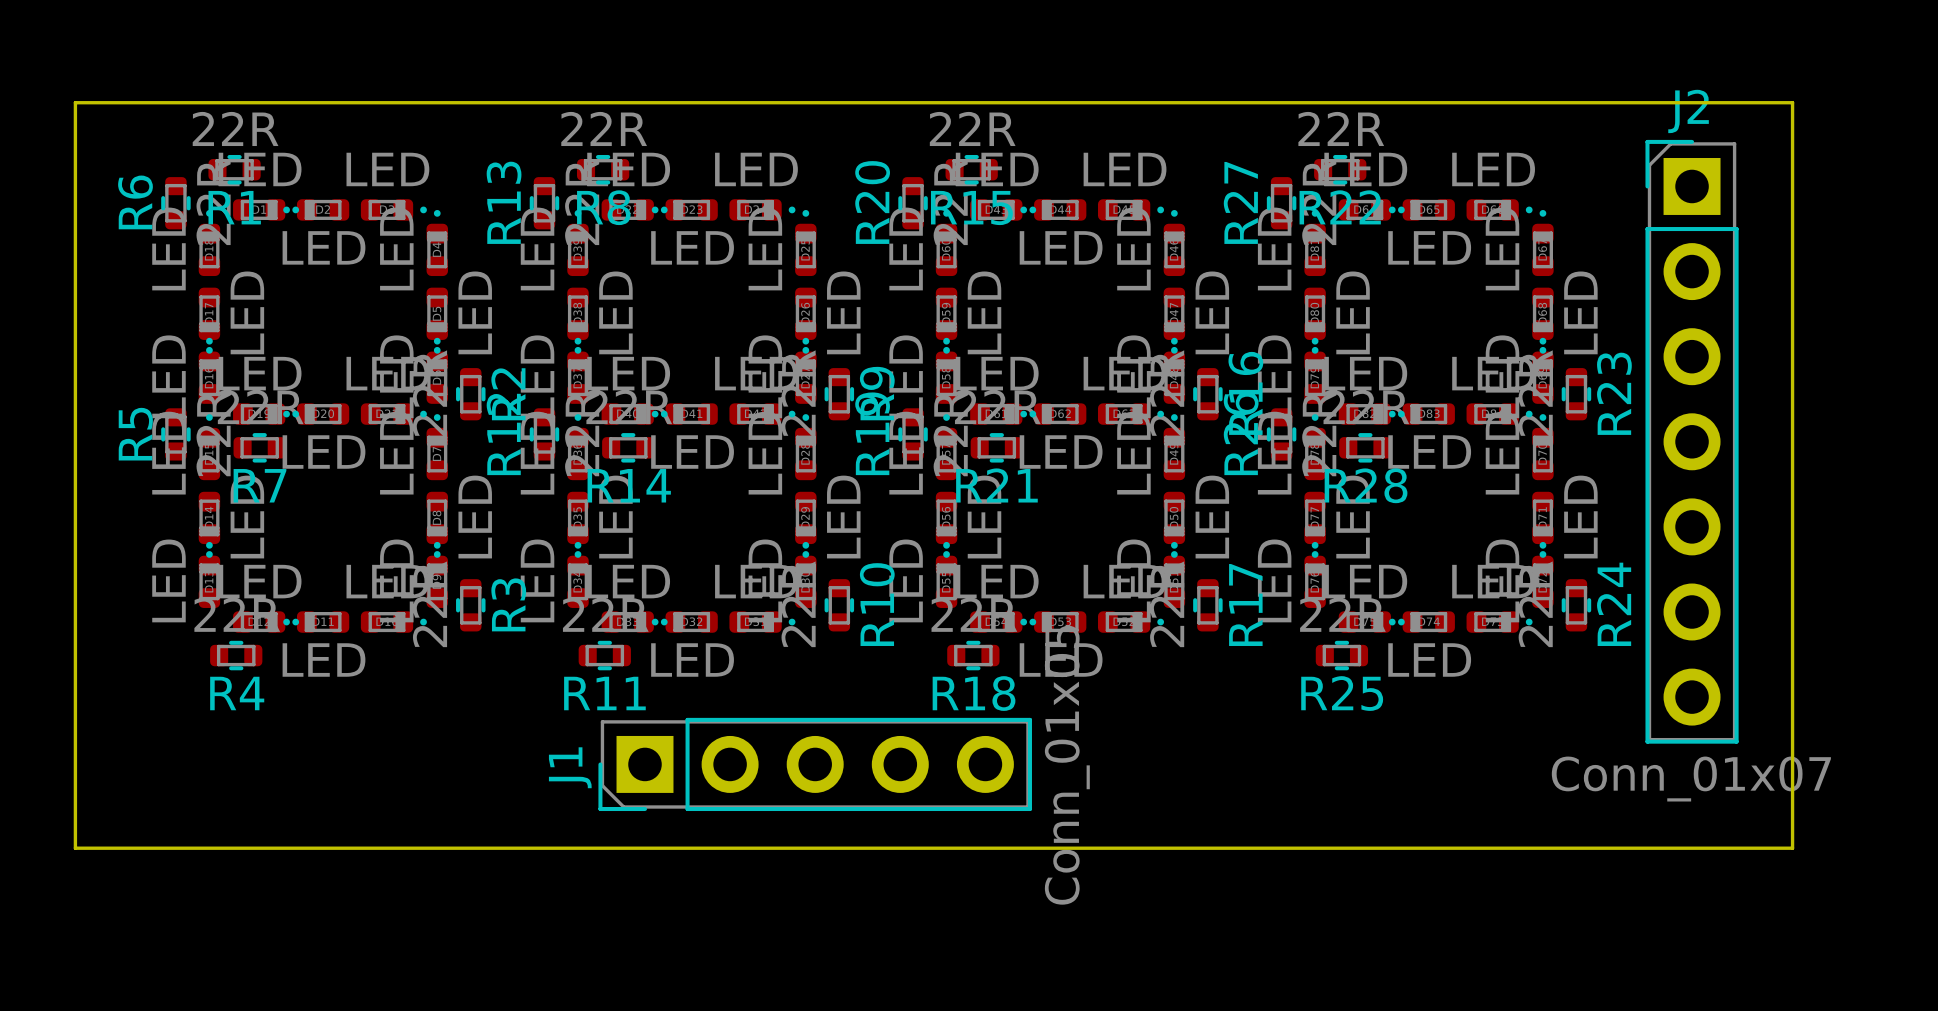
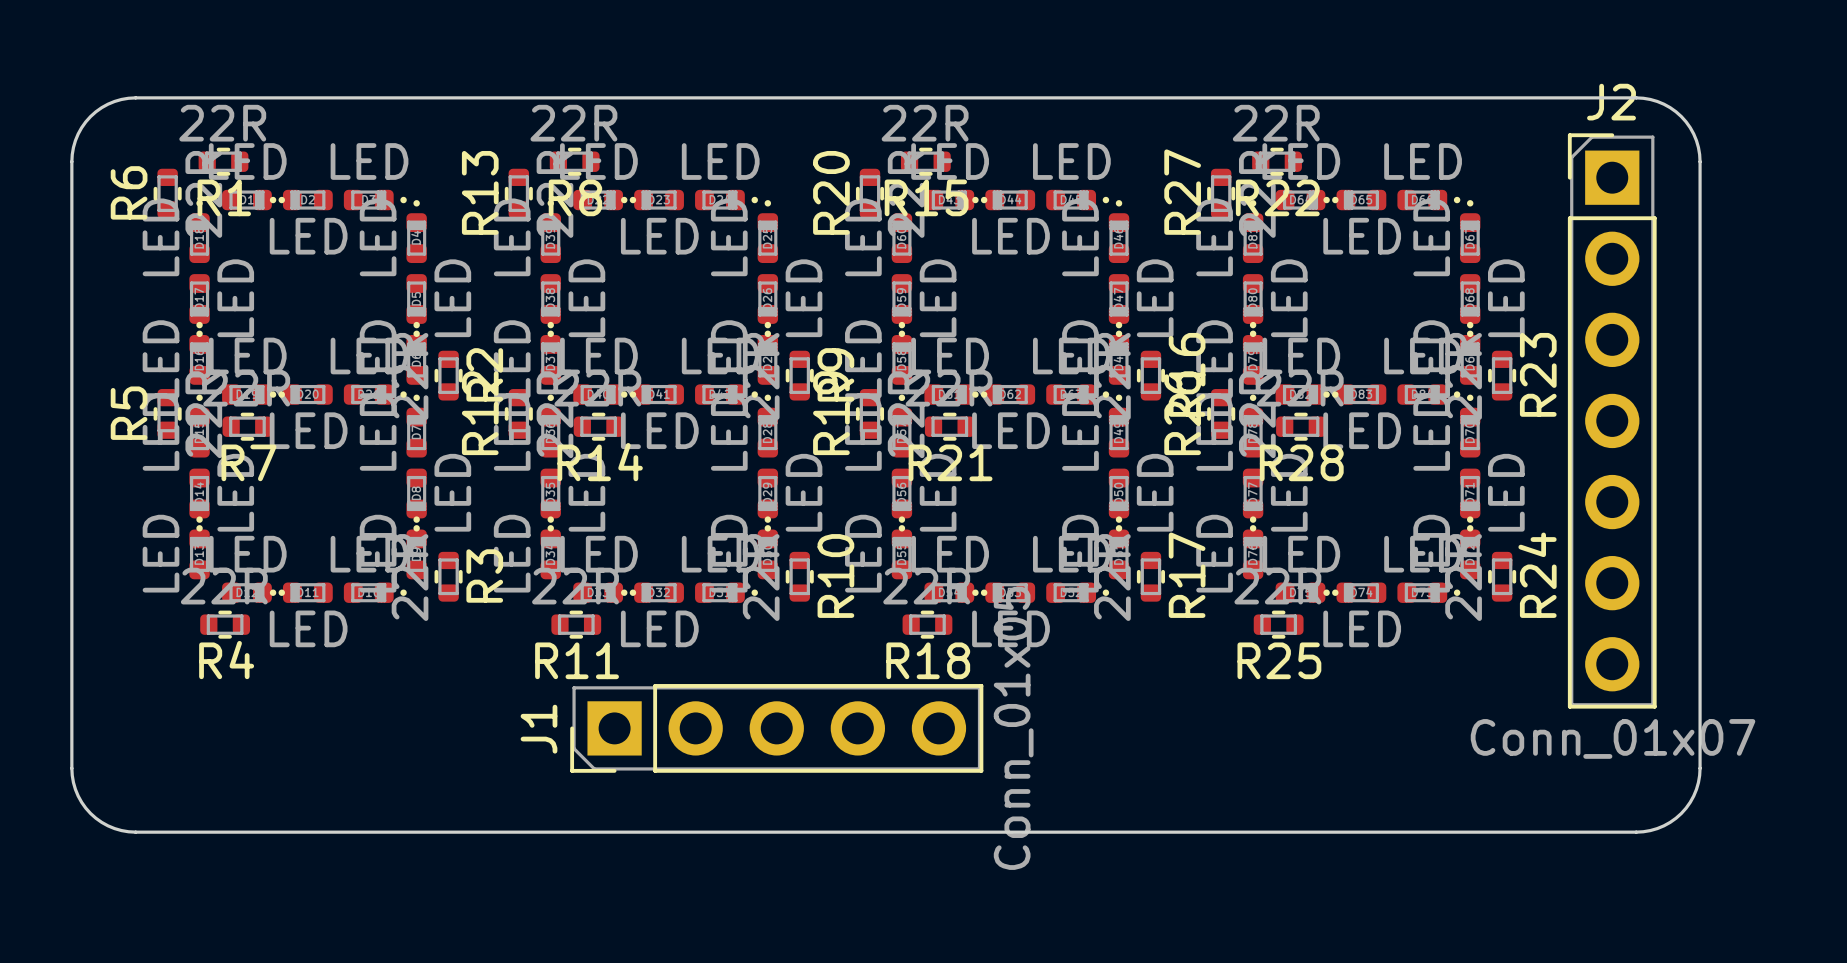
board edge: (142, 102) (75, 102) (75, 169) -> (135, 97) (114, 101) (101, 107) (90, 116) (81, 127) (75, 140) (71, 161)
board edge: (1717, 102) (1792, 102) (1792, 848) (75, 848) (75, 806) -> (1636, 97) (1657, 101) (1670, 107) (1681, 116) (1693, 134) (1698, 147) (1700, 161) (1700, 768) (1698, 782) (1690, 802) (1681, 813) (1663, 825) (1650, 830) (1636, 832) (135, 832) (121, 830) (108, 825) (90, 813) (81, 802) (75, 789) (71, 768)

